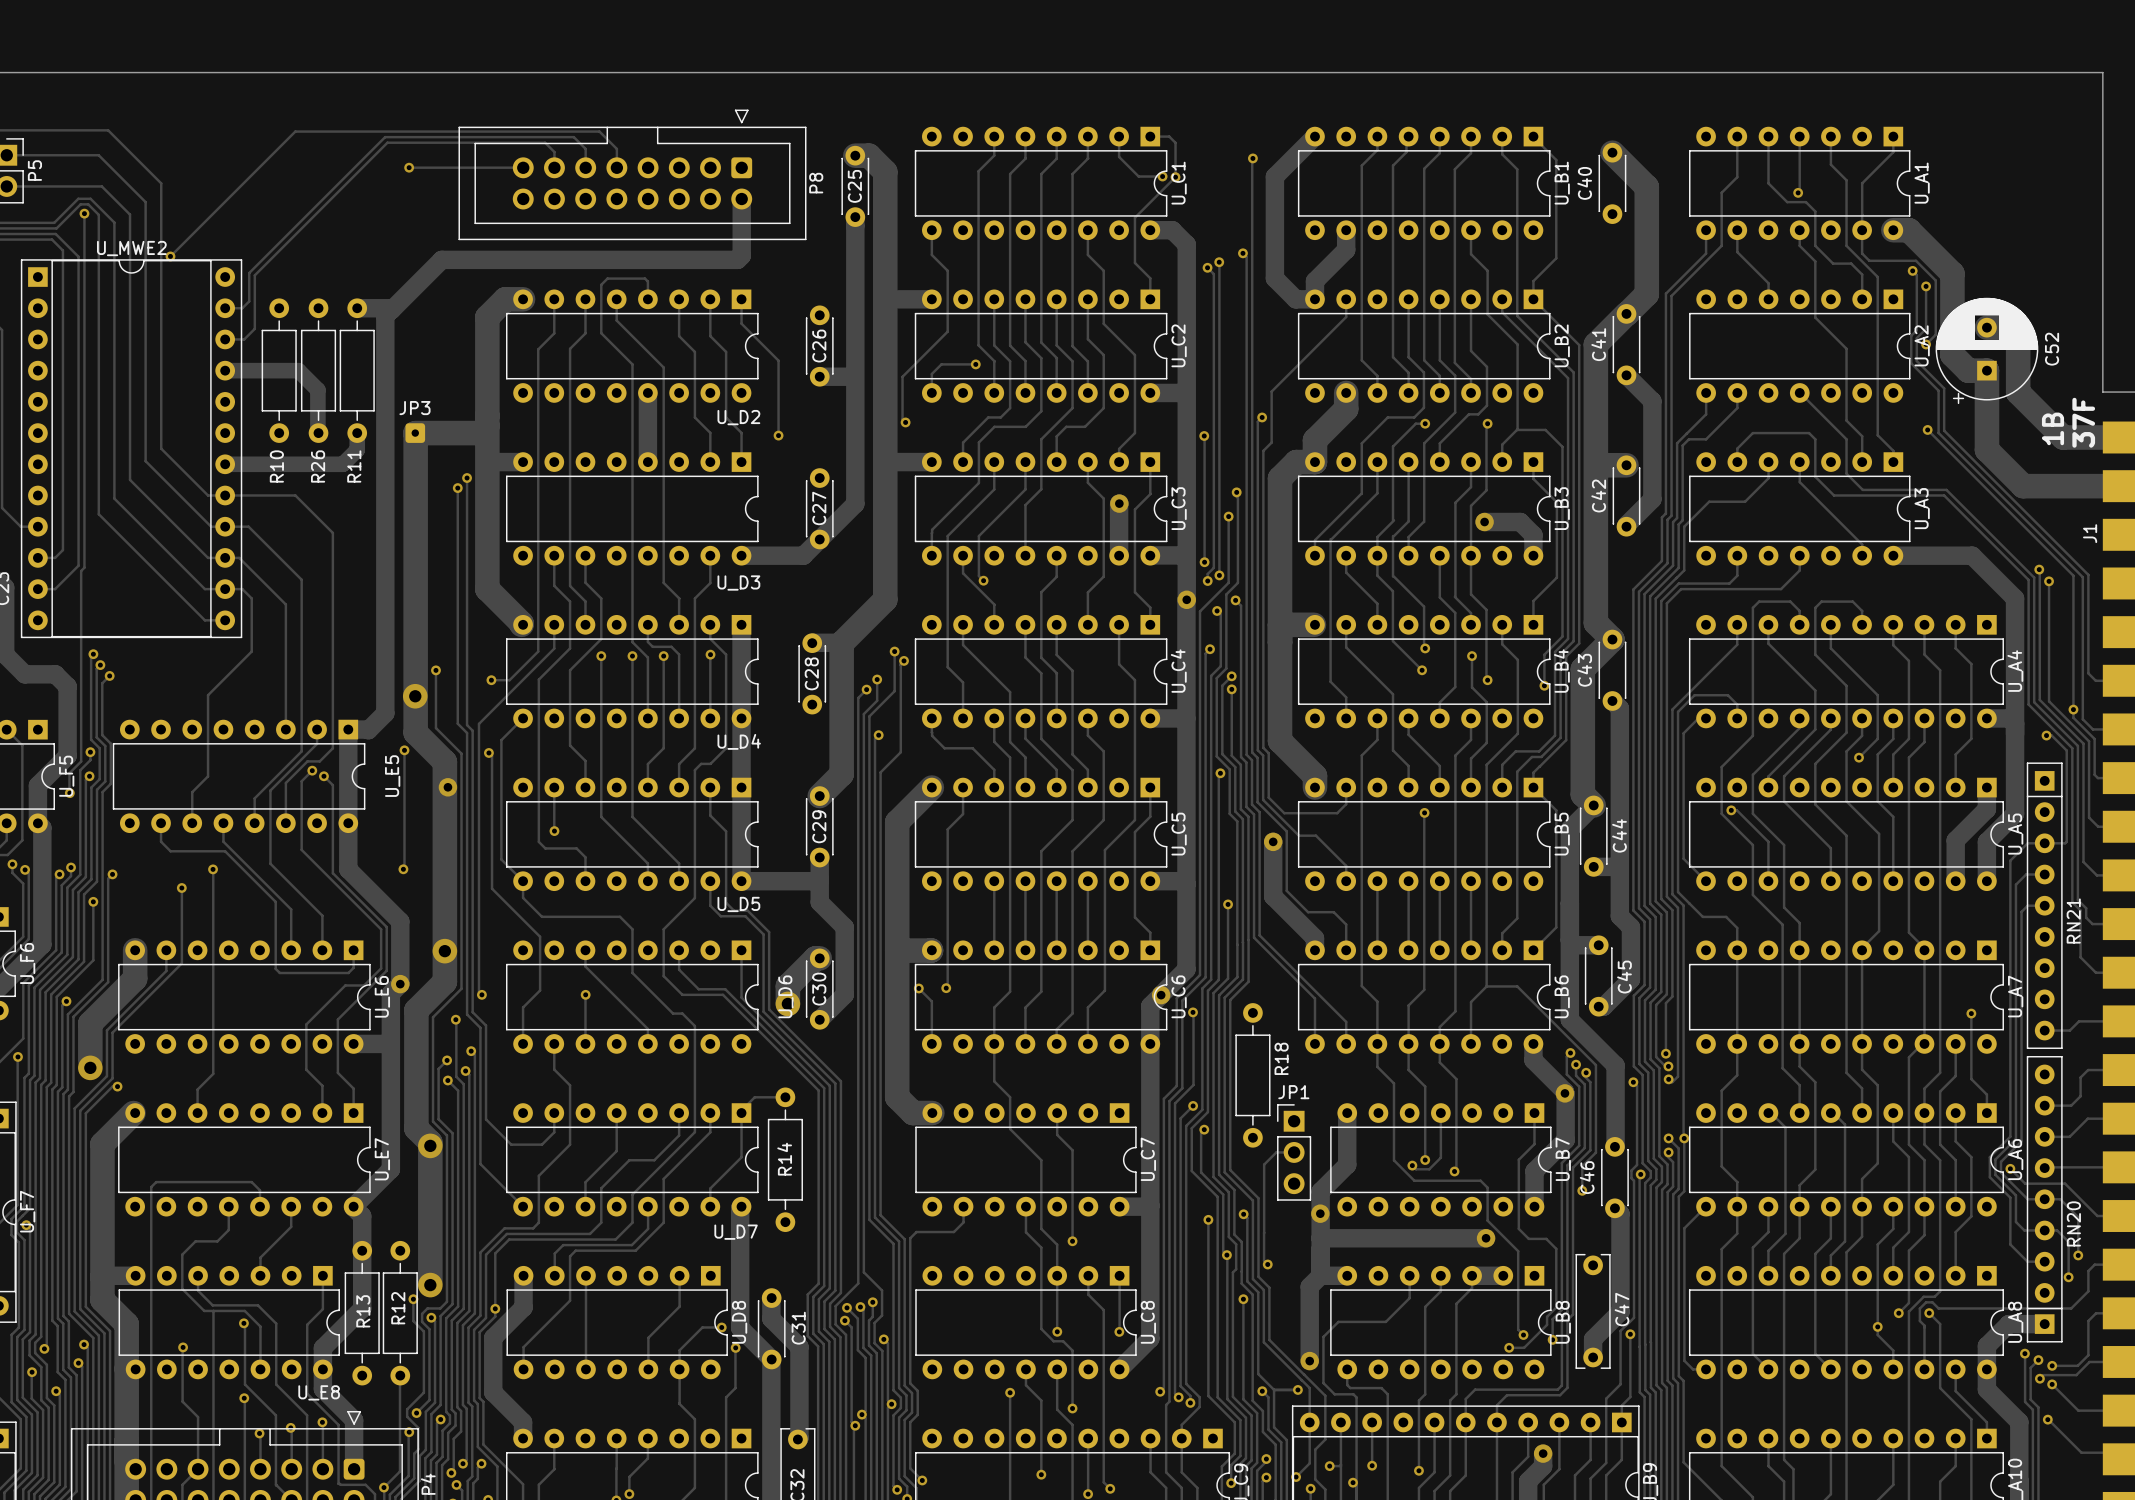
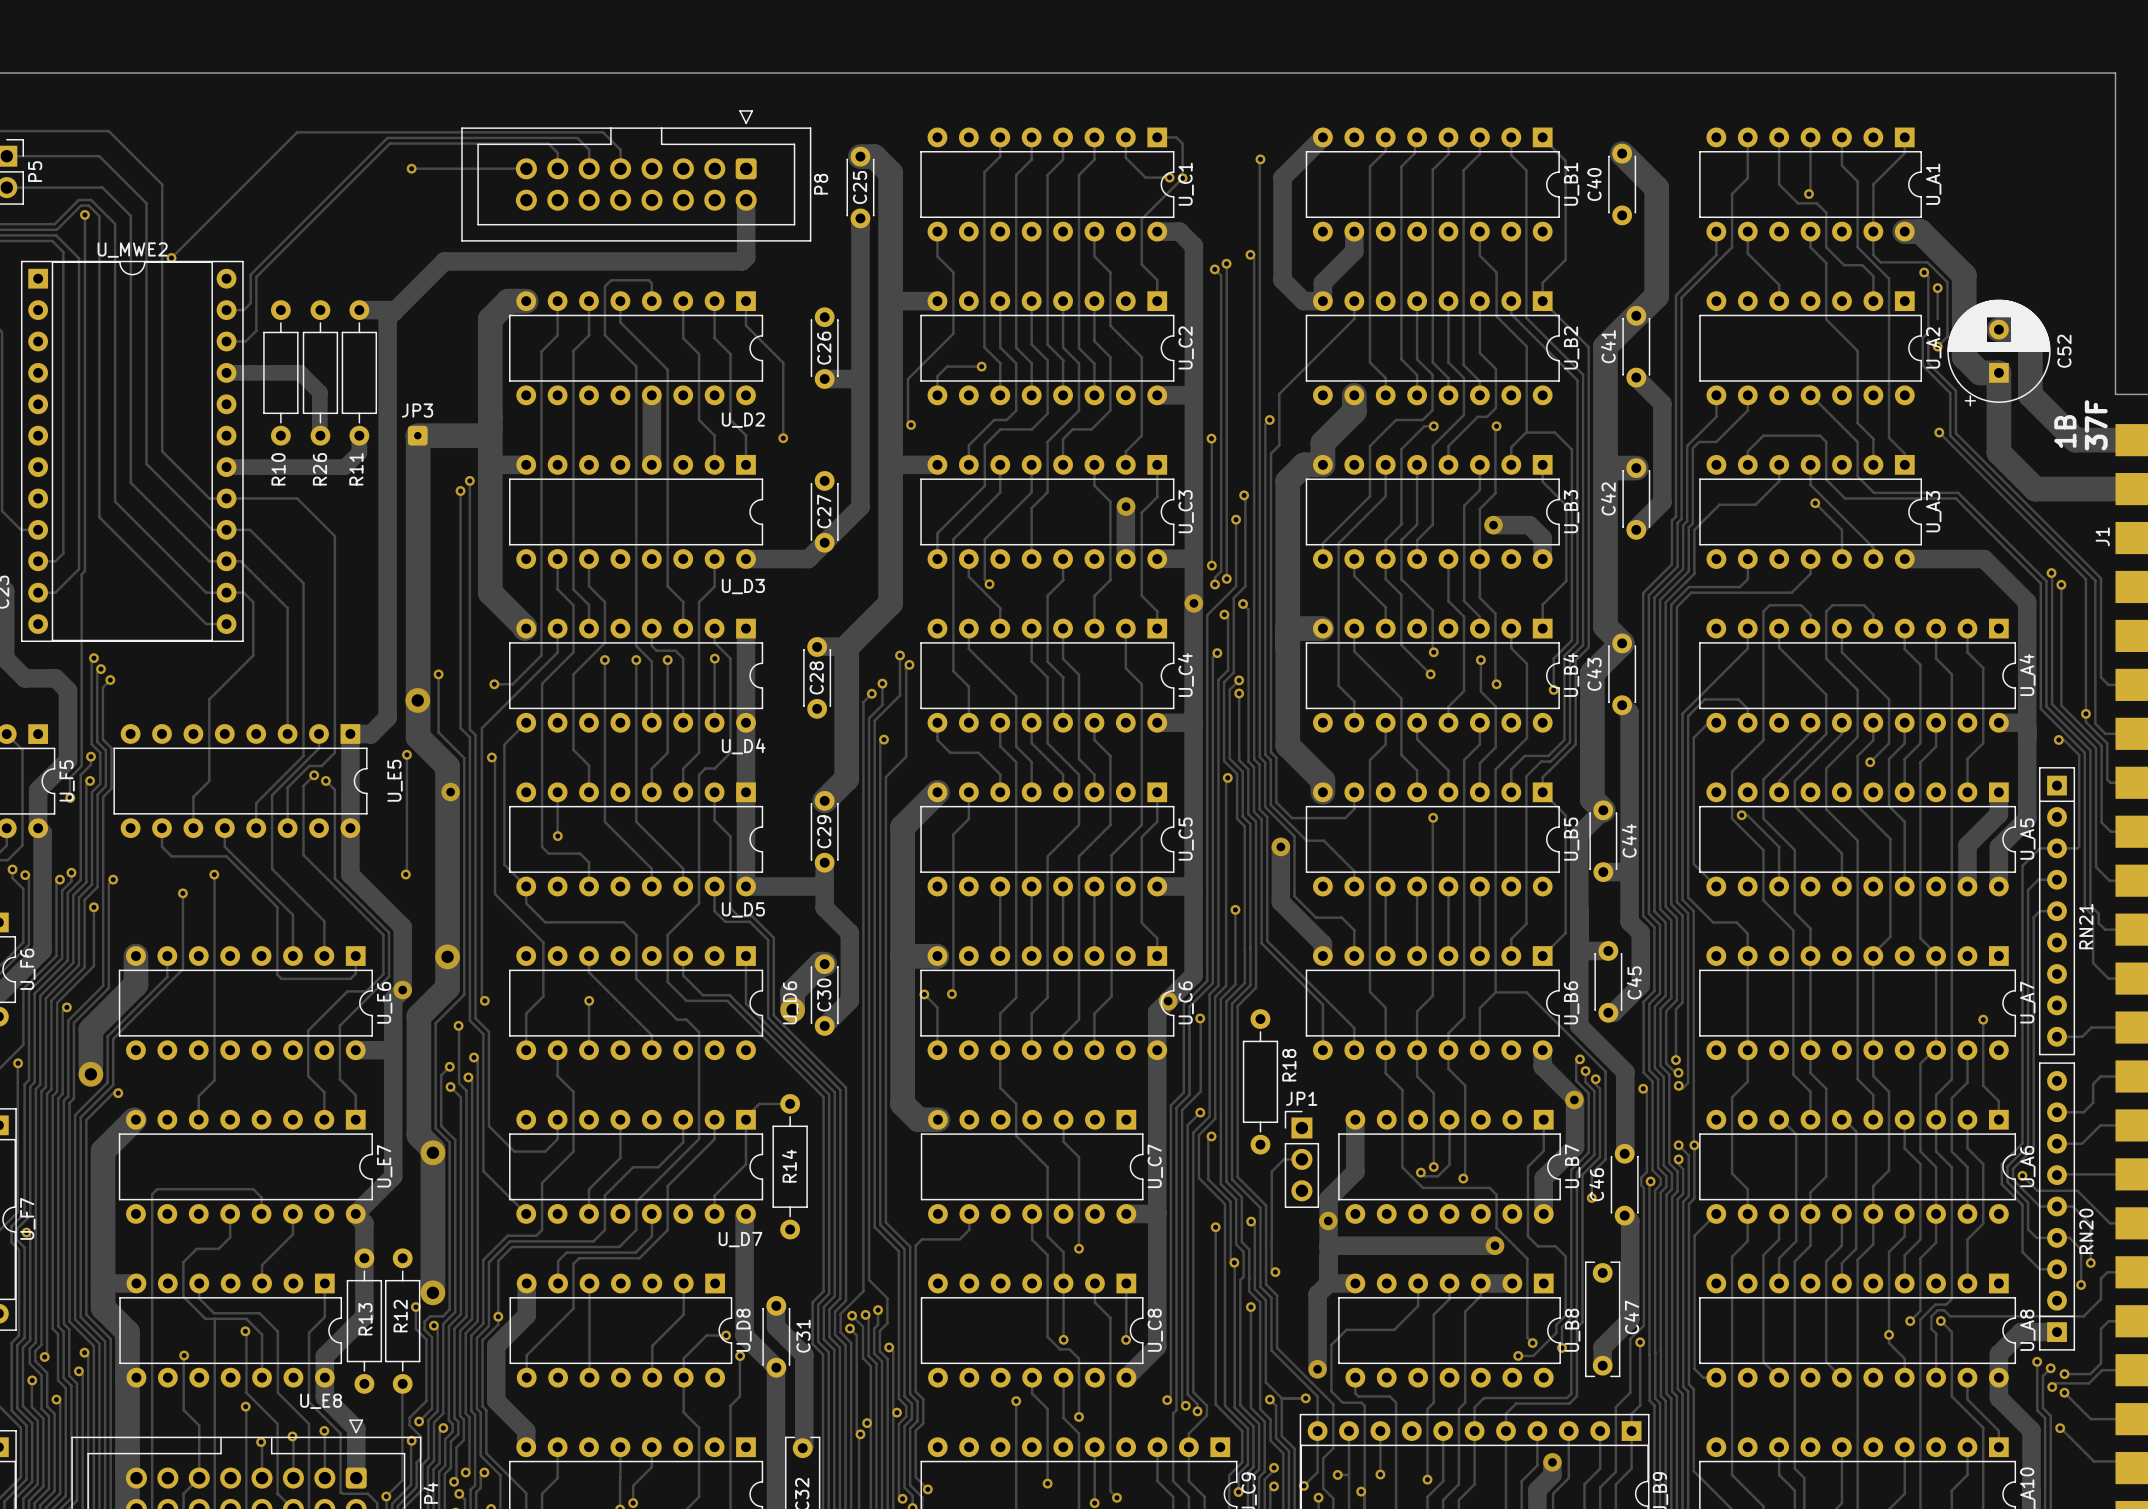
track: (1926, 317) (1926, 328) (1916, 338) -> none
track: none -> (1815, 503) (1842, 529) (1842, 559)
via: none -> (1815, 503)

